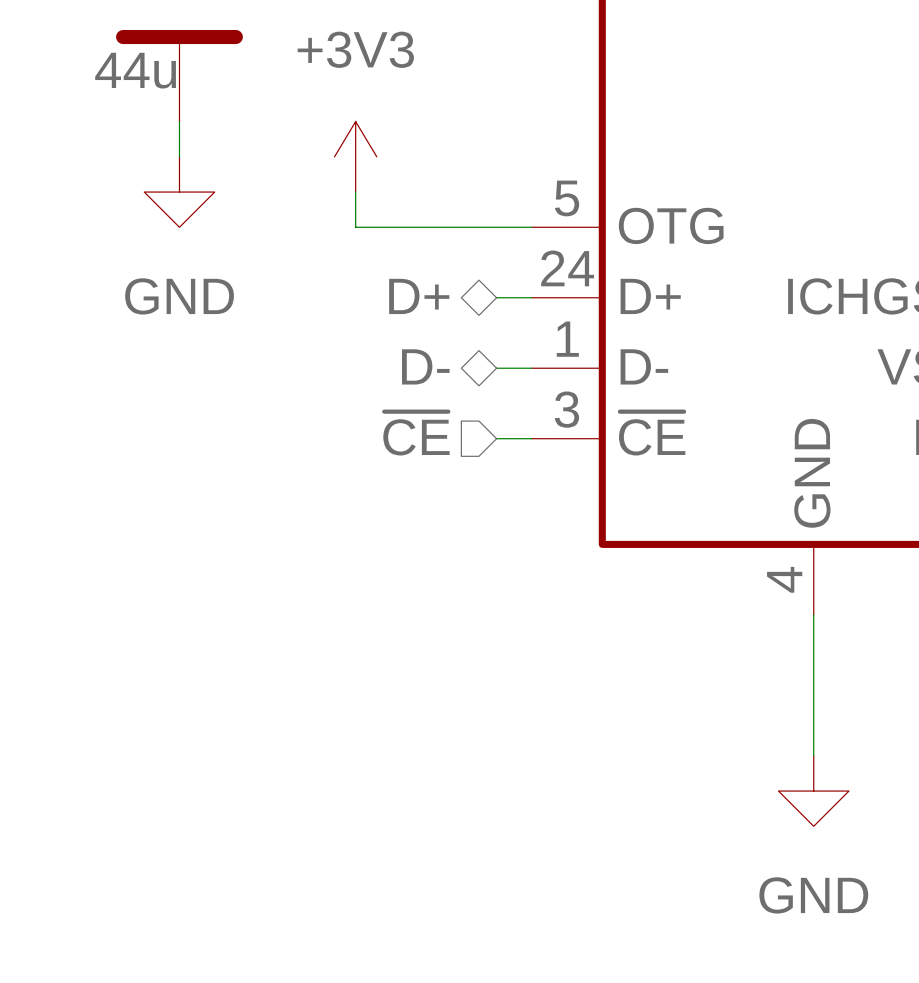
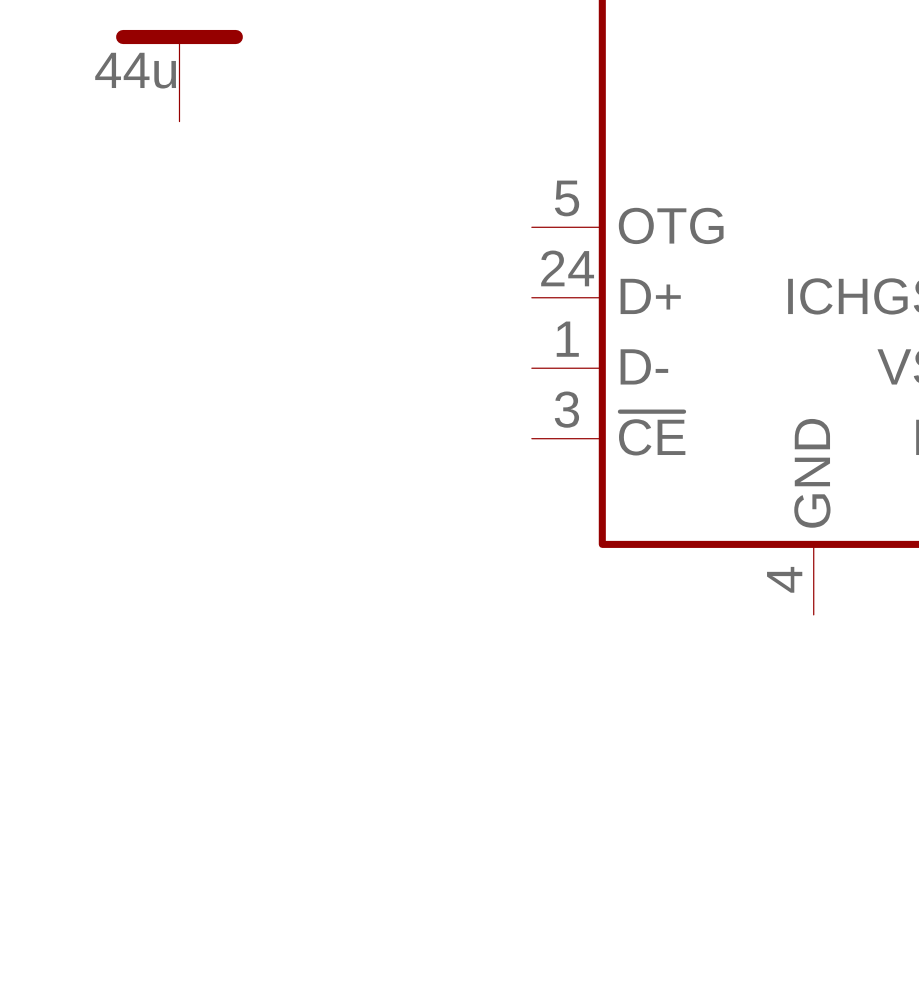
wire: (179, 121) (179, 156) -> none
power symbol: +3V3 (355, 156) -> none
power symbol: GND (179, 192) -> none
wire: (355, 192) (355, 227) (531, 227) -> none
hierarchical label: D+ (419, 296) -> none
wire: (496, 297) (531, 297) -> none
hierarchical label: D- (425, 366) -> none
wire: (496, 368) (531, 368) -> none
hierarchical label: ~{CE} (416, 433) -> none
wire: (496, 438) (531, 438) -> none
wire: (813, 614) (813, 755) -> none
power symbol: GND (813, 791) -> none

